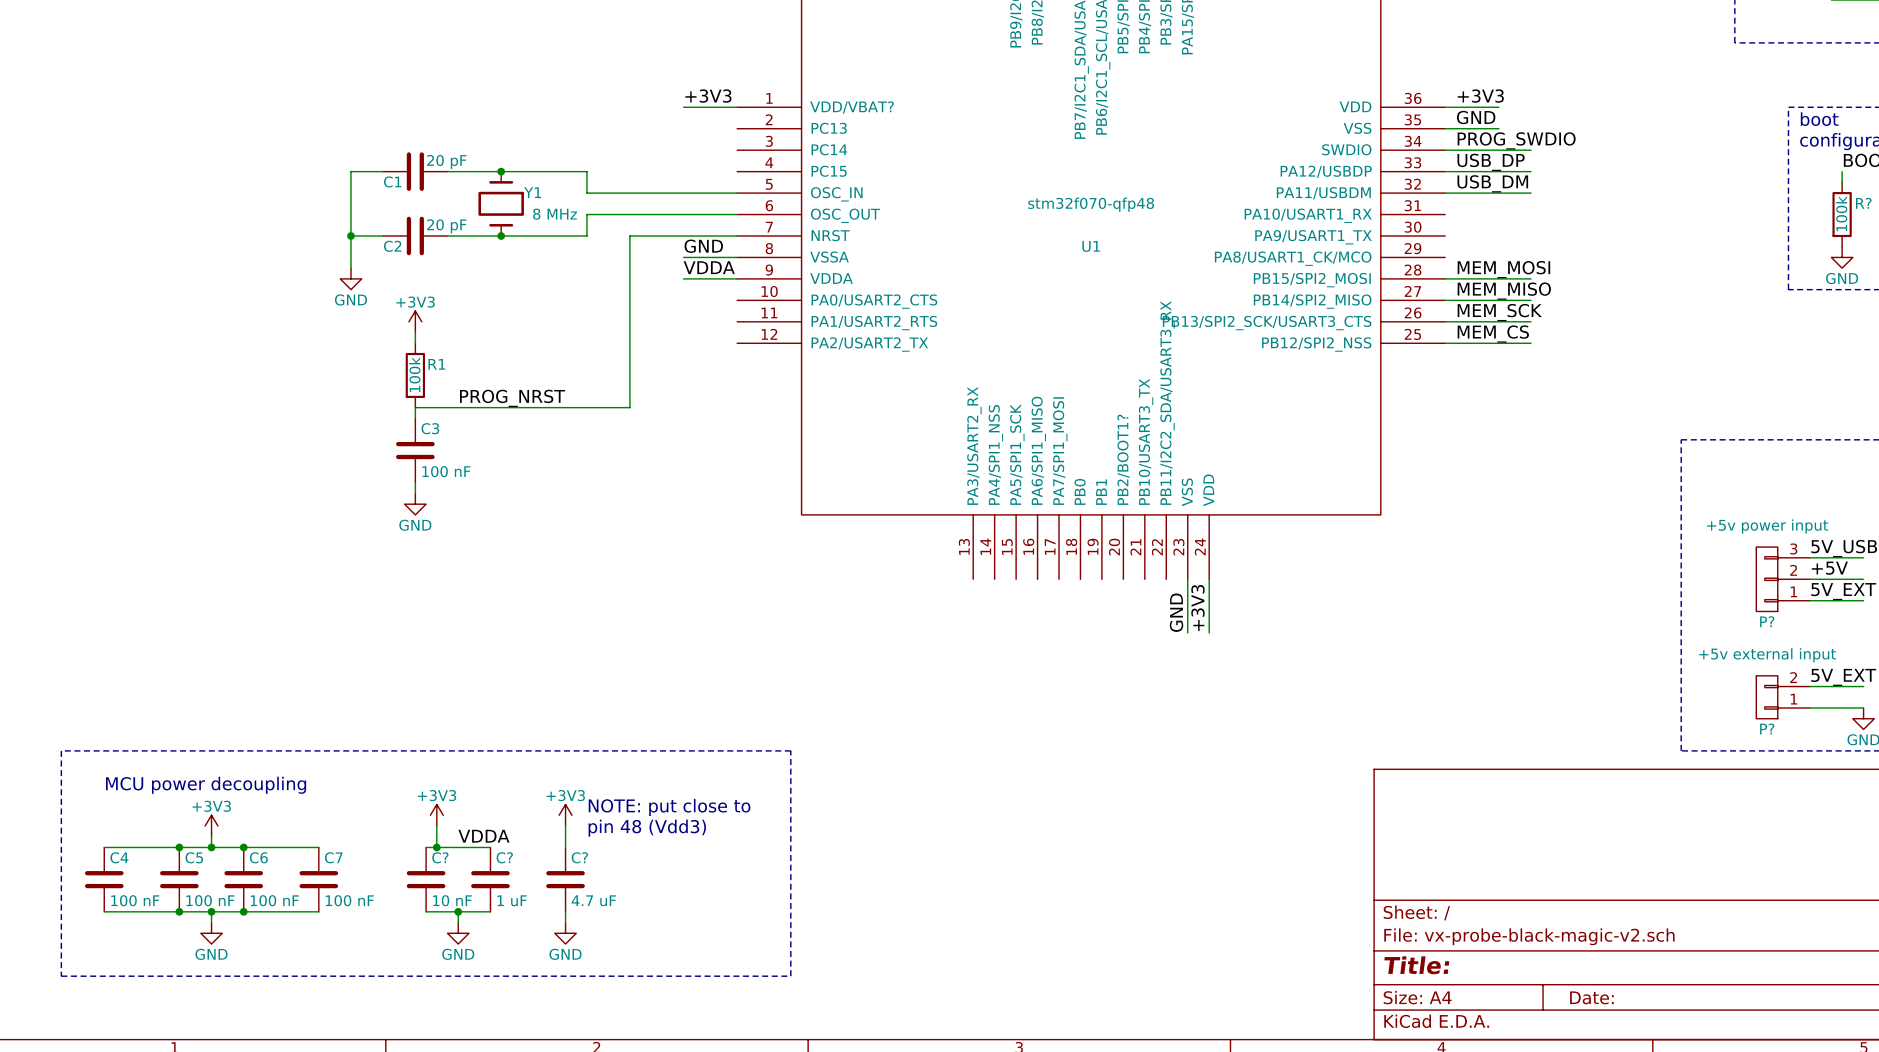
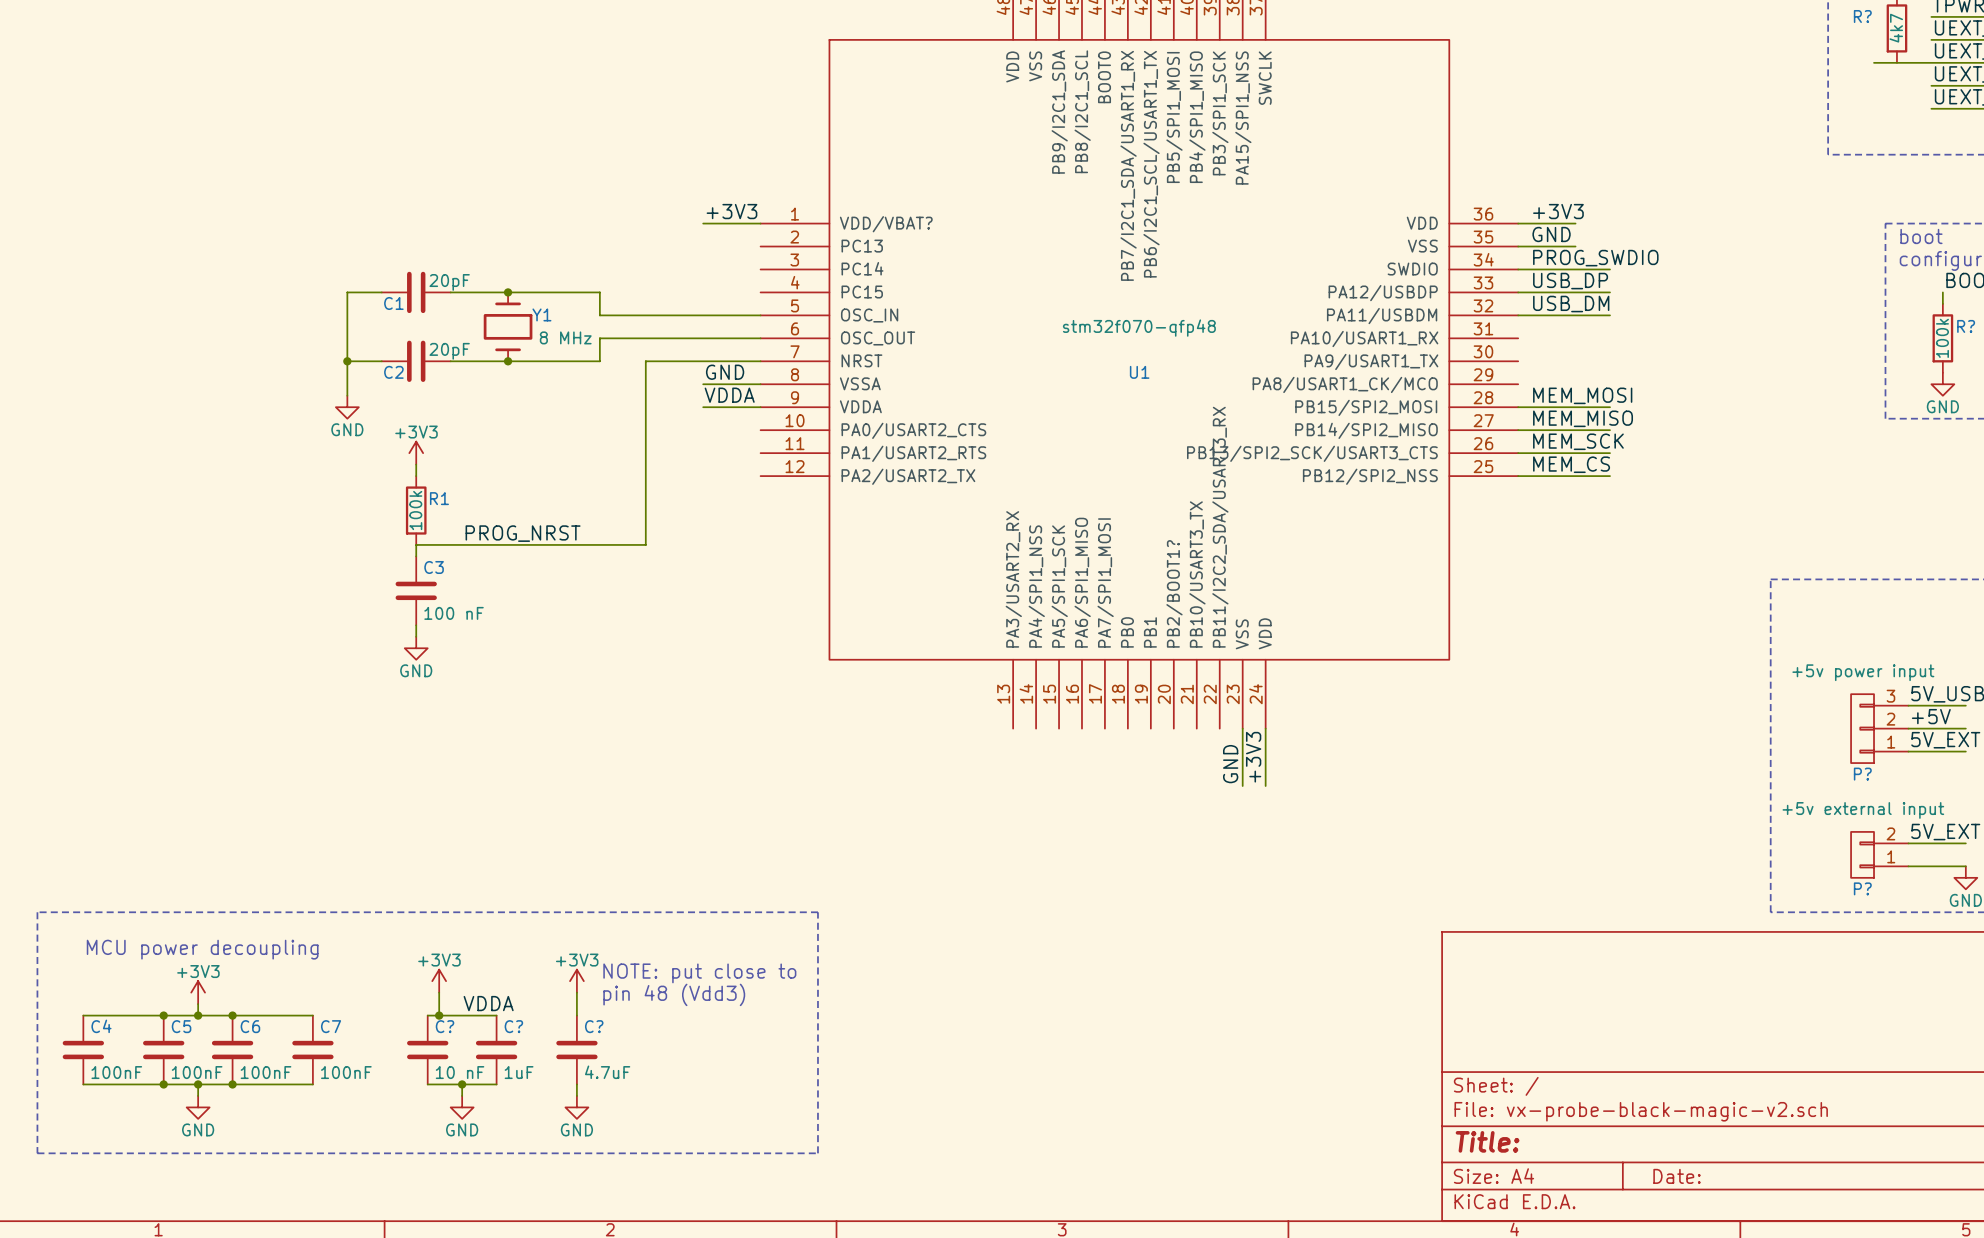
C1 value: 20 pF (446, 161) -> 20pF (449, 282)
C2 value: 20 pF (446, 226) -> 20pF (449, 351)
C4 value: 100 nF (135, 900) -> 100nF (116, 1072)
C5 value: 100 nF (210, 900) -> 100nF (197, 1072)
C6 value: 100 nF (274, 900) -> 100nF (266, 1072)
C7 value: 100 nF (349, 900) -> 100nF (346, 1072)
C? value: 1 uF (512, 900) -> 1uF (519, 1072)
C? value: 4.7 uF (593, 900) -> 4.7uF (607, 1072)

